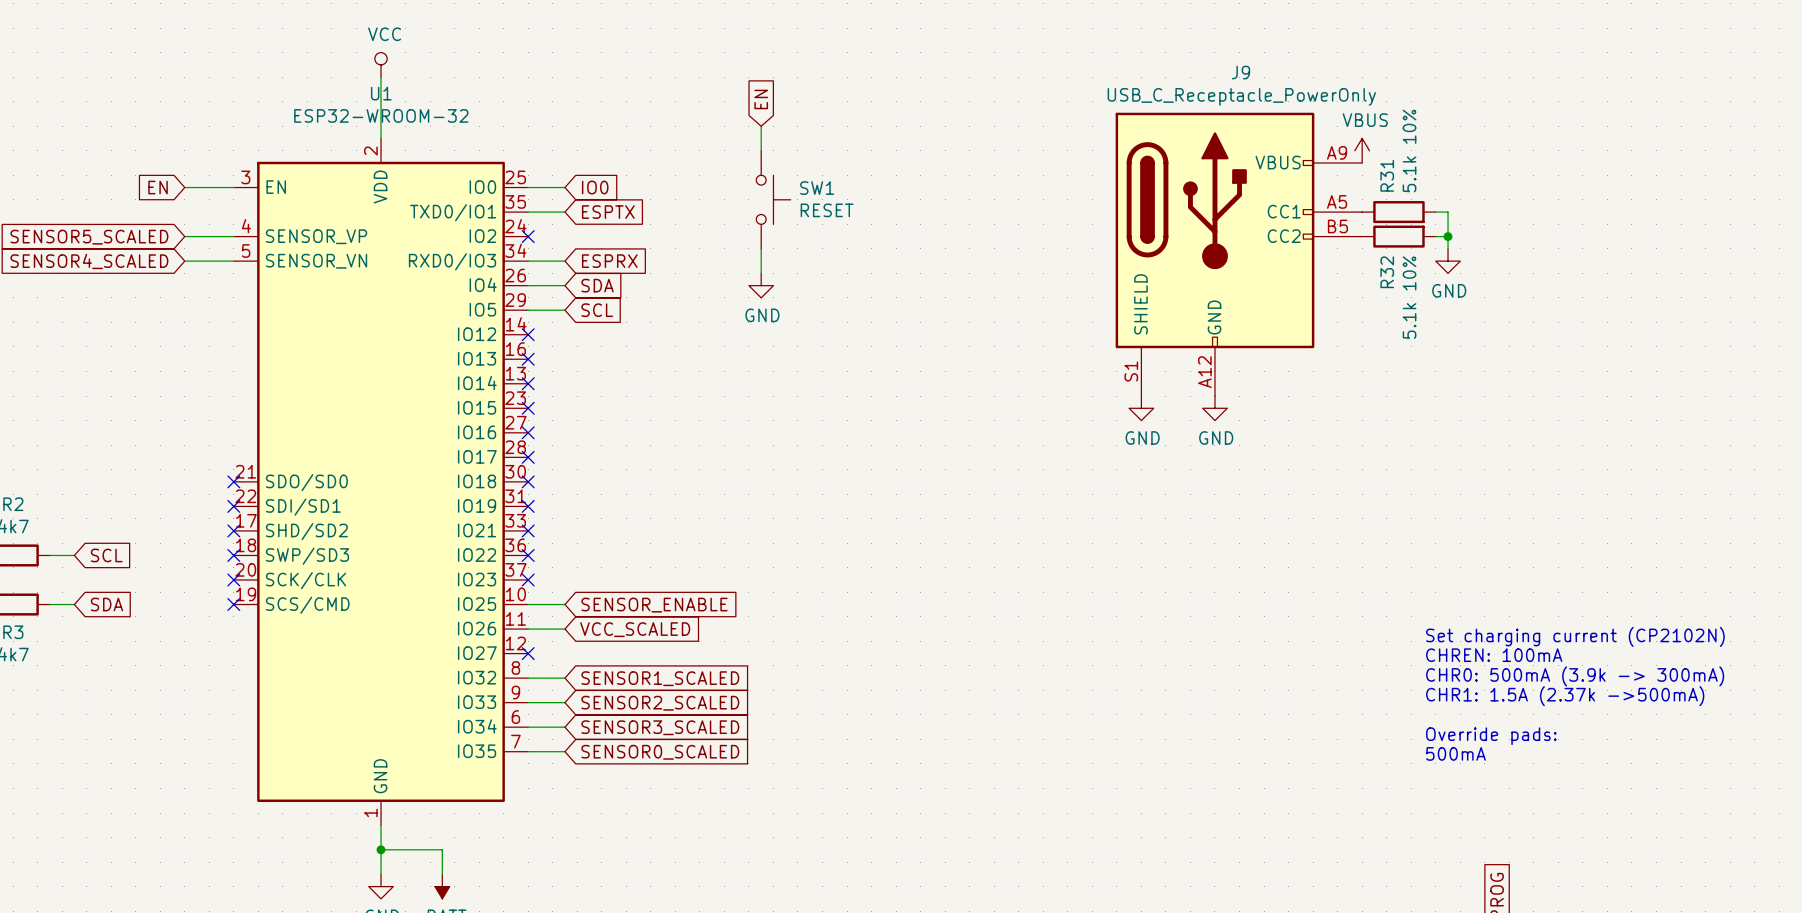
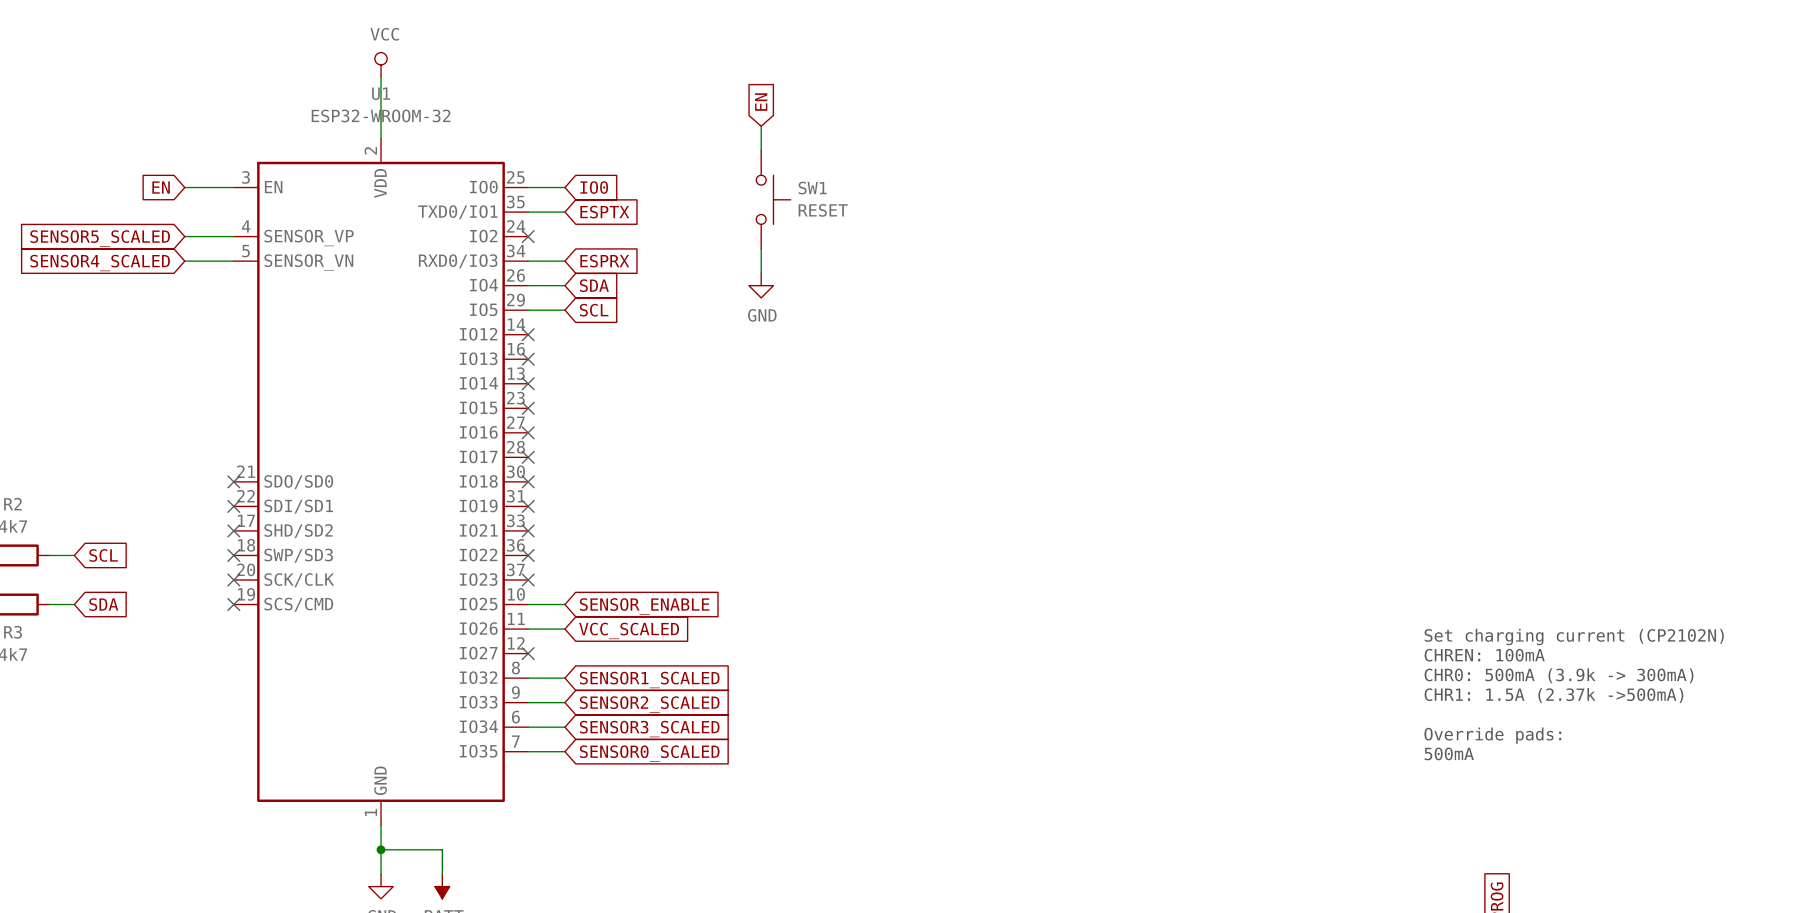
power symbol: VBUS (1362, 150) -> none
R31: 5.1k 10% (1398, 212) -> none
wire: (1435, 212) (1448, 212) (1448, 248) -> none
R32: 5.1k 10% (1398, 236) -> none
wire: (1435, 236) (1448, 236) -> none
junction: (1448, 236) -> none
J9: USB_C_Receptacle_PowerOnly (1238, 254) -> none
power symbol: GND (1448, 261) -> none
power symbol: GND (1141, 408) -> none
power symbol: GND (1214, 408) -> none

